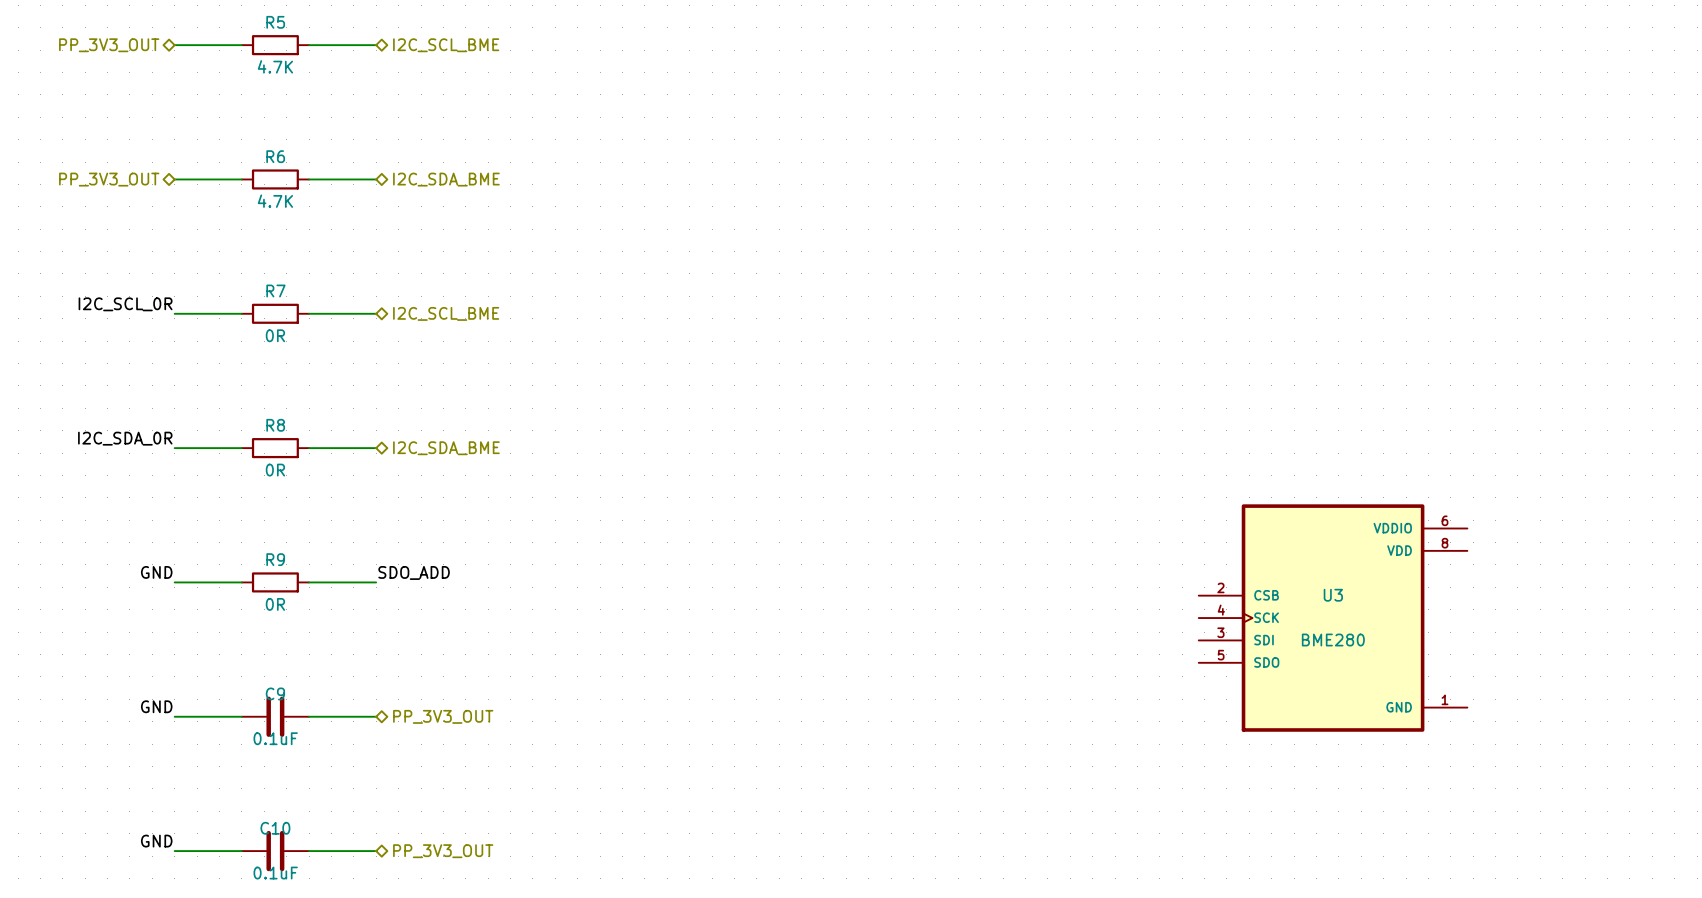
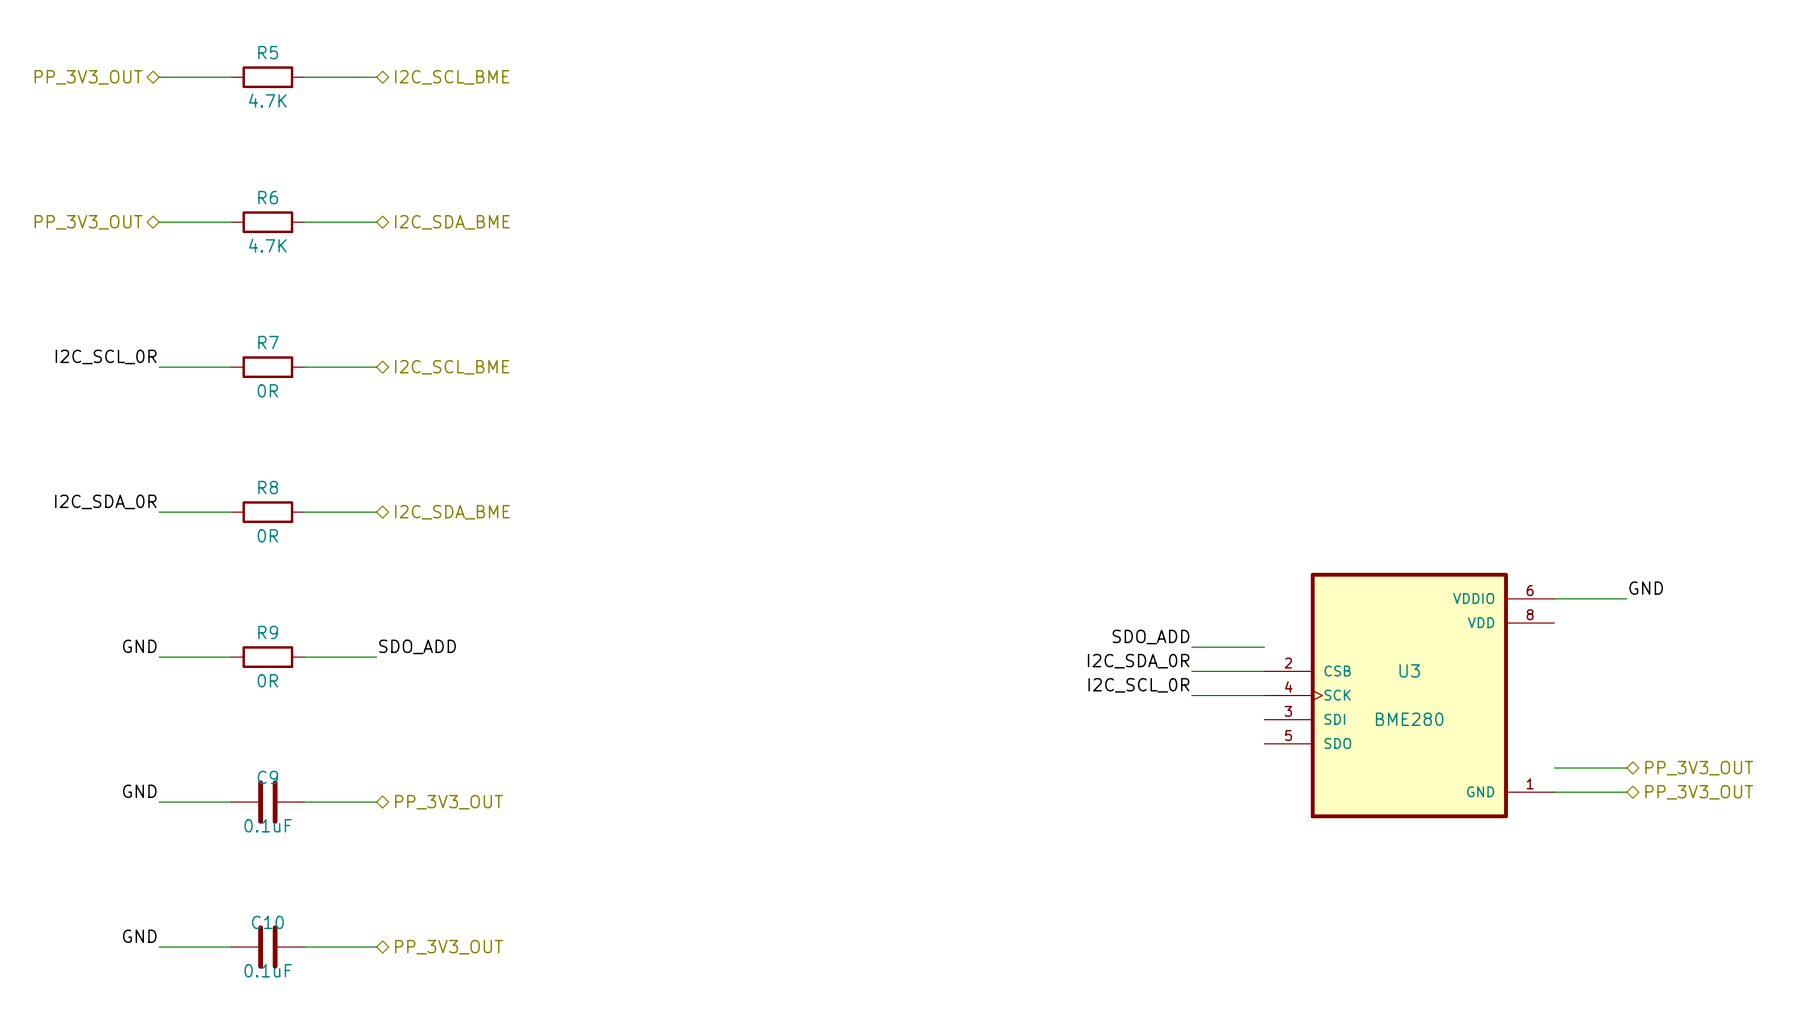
label: none -> GND (1646, 588)
wire: none -> (1554, 598) (1626, 598)
label: none -> SDO_ADD (1150, 637)
wire: none -> (1191, 647) (1264, 647)
label: none -> I2C_SDA_0R (1138, 661)
wire: none -> (1191, 671) (1264, 671)
label: none -> I2C_SCL_0R (1138, 685)
wire: none -> (1191, 695) (1264, 695)
wire: none -> (1554, 768) (1626, 768)
hierarchical label: none -> PP_3V3_OUT (1699, 768)
wire: none -> (1554, 792) (1626, 792)
hierarchical label: none -> PP_3V3_OUT (1699, 792)

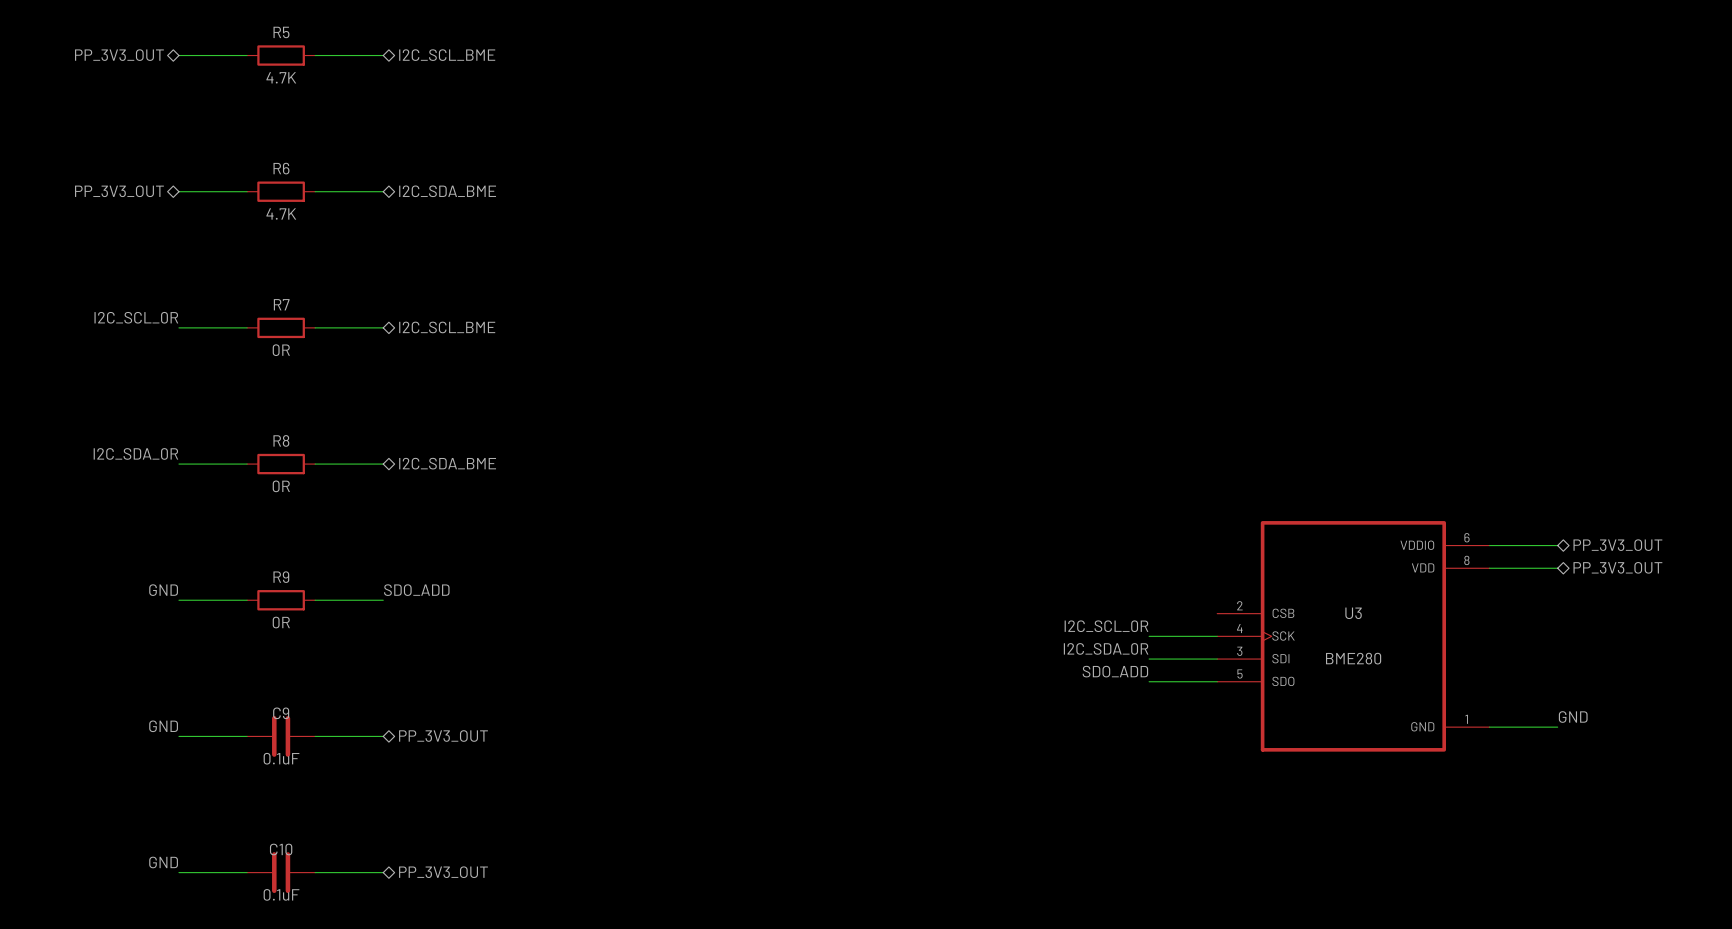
label position: GND (1646, 588) -> GND (1573, 717)
hierarchical label: none -> PP_3V3_OUT (1617, 545)
hierarchical label: none -> PP_3V3_OUT (1617, 567)
label position: SDO_ADD (1150, 637) -> SDO_ADD (1115, 671)
wire: (1191, 647) (1264, 647) -> (1149, 659) (1217, 659)
label position: I2C_SDA_0R (1138, 661) -> I2C_SDA_0R (1106, 648)
wire: (1191, 671) (1264, 671) -> (1149, 681) (1217, 681)
wire: (1554, 768) (1626, 768) -> (1489, 568) (1557, 568)
hierarchical label: PP_3V3_OUT (1699, 768) -> none
hierarchical label: PP_3V3_OUT (1699, 792) -> none

